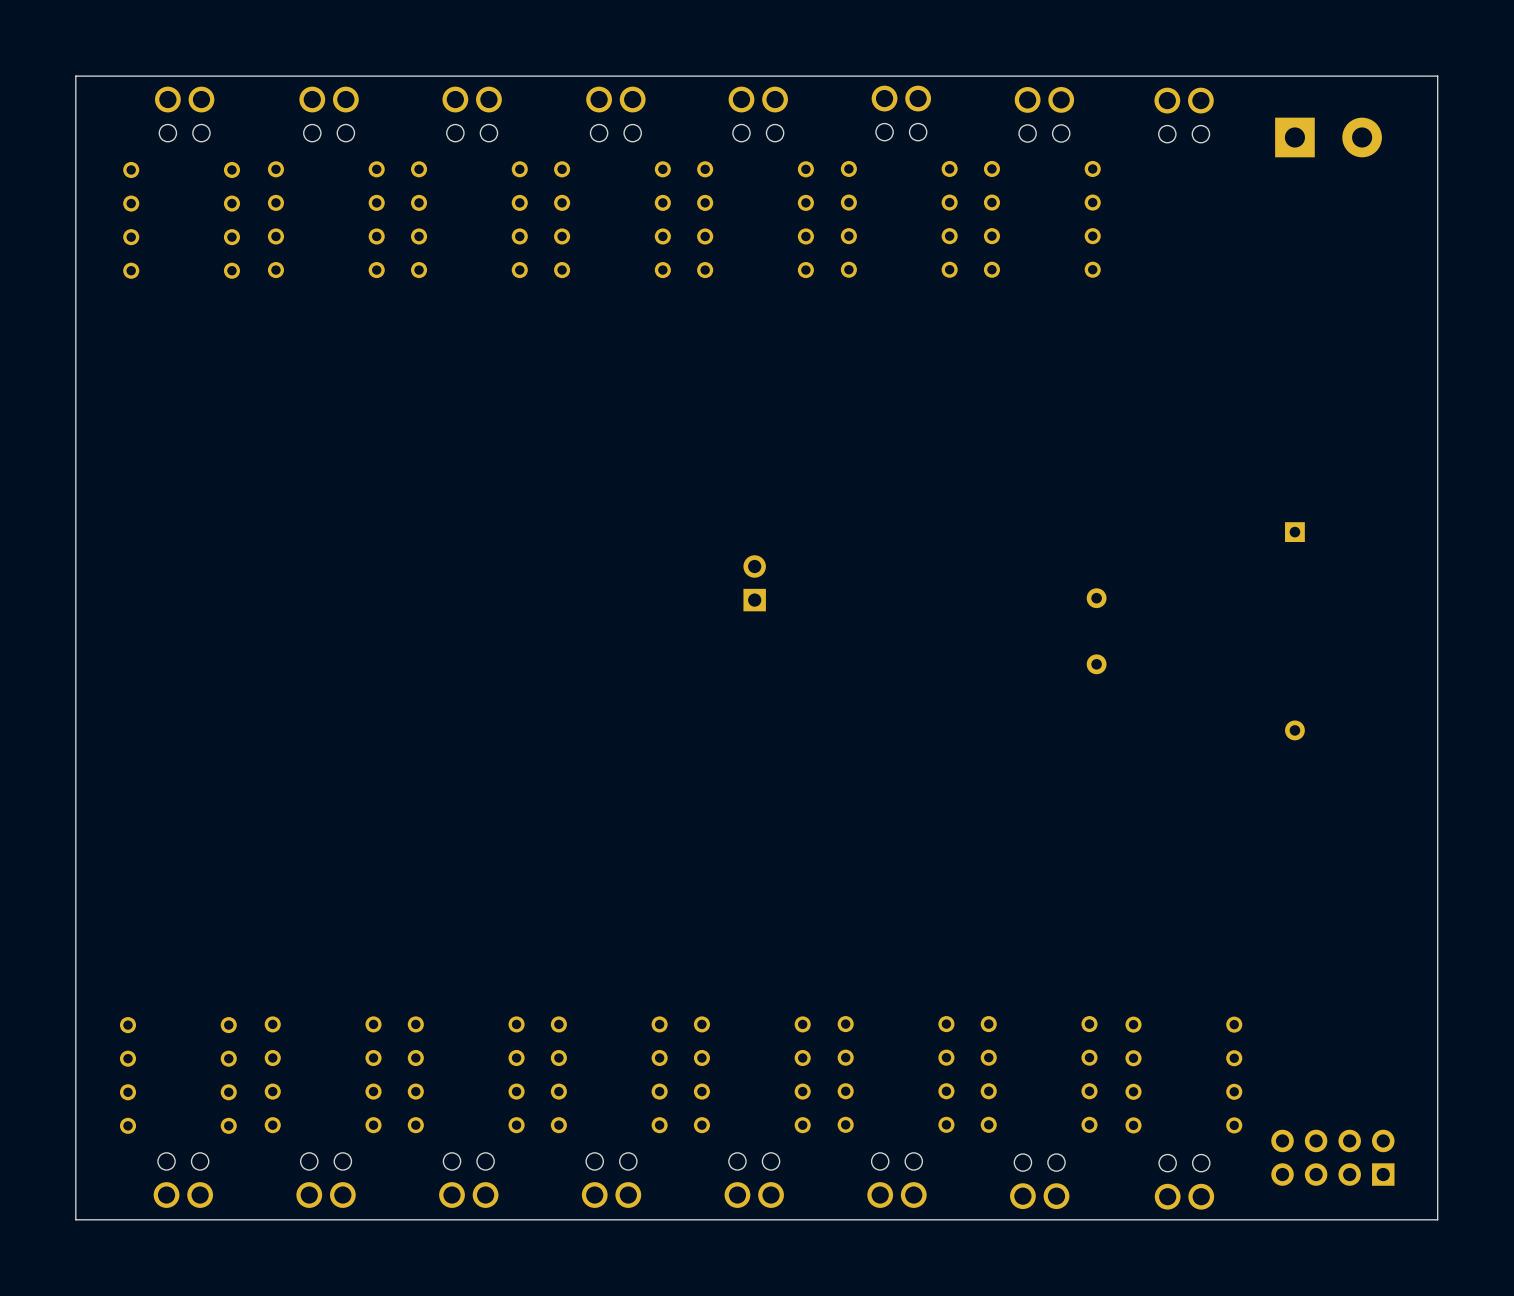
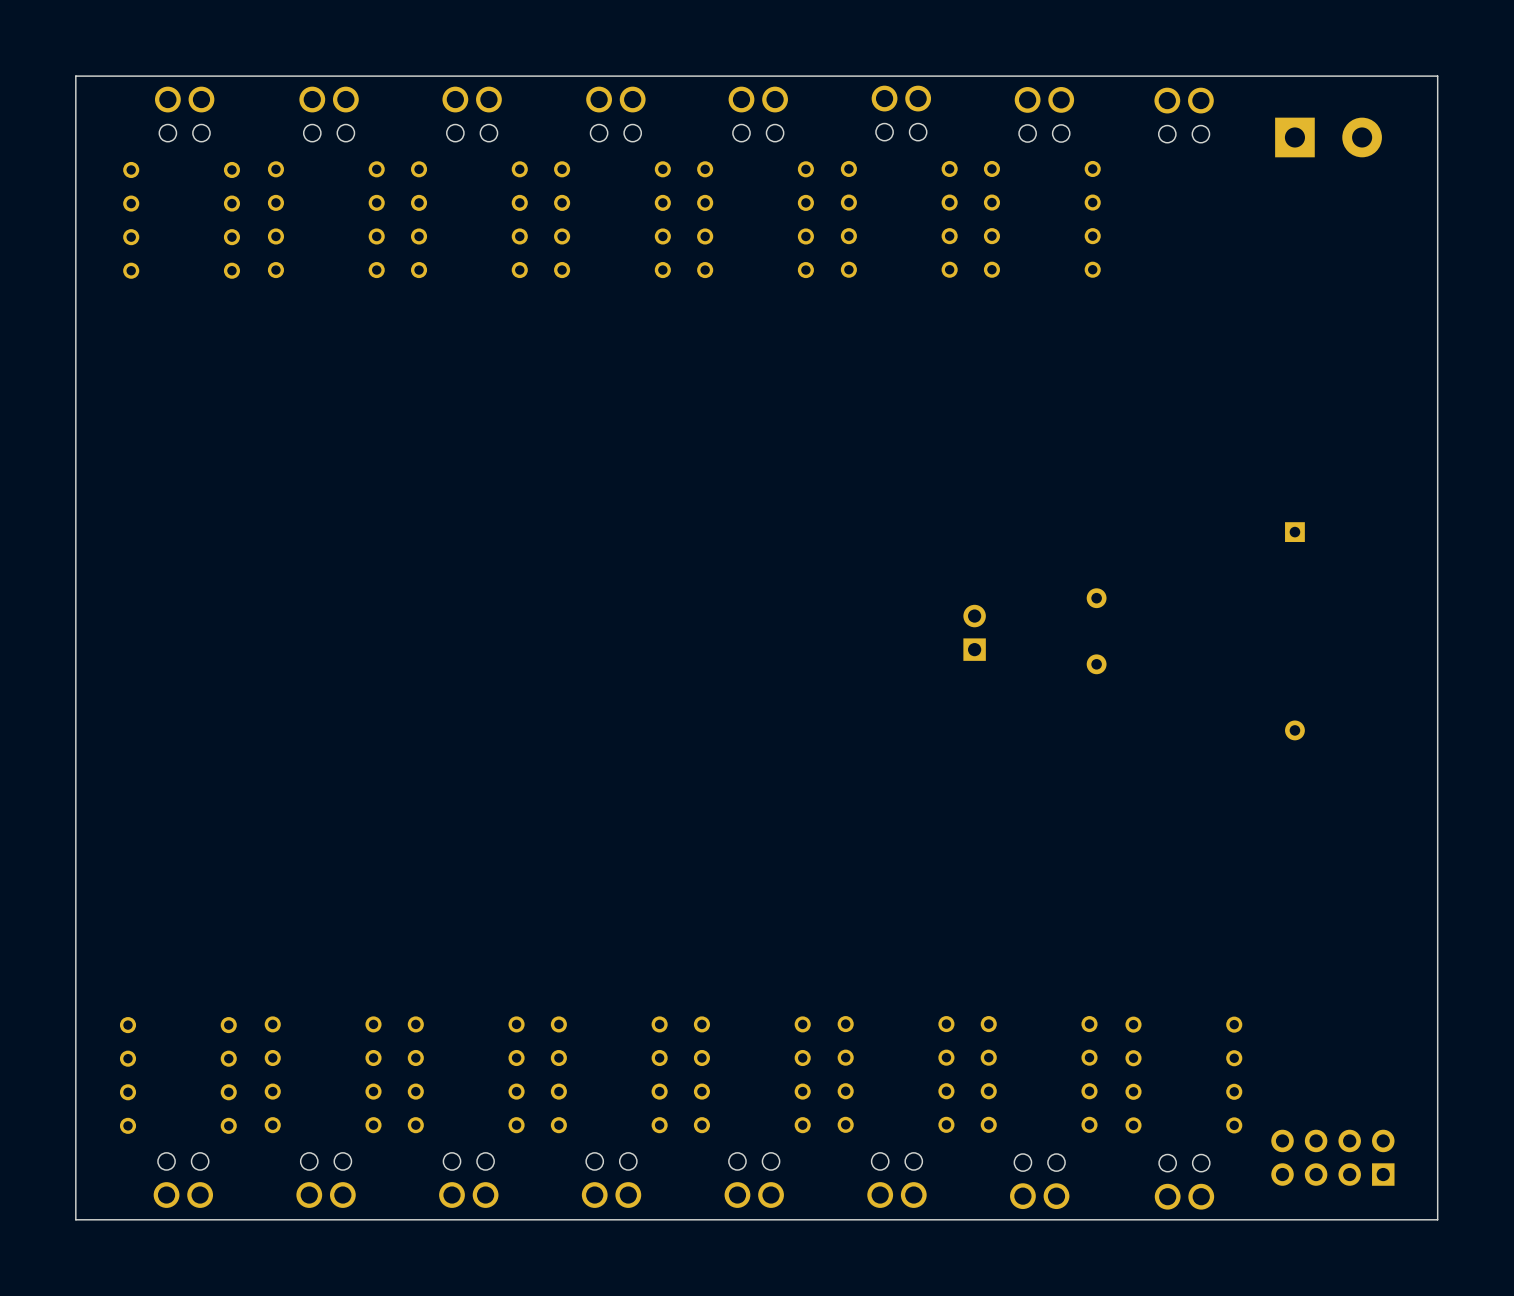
part position: (754, 583) -> (974, 632)

